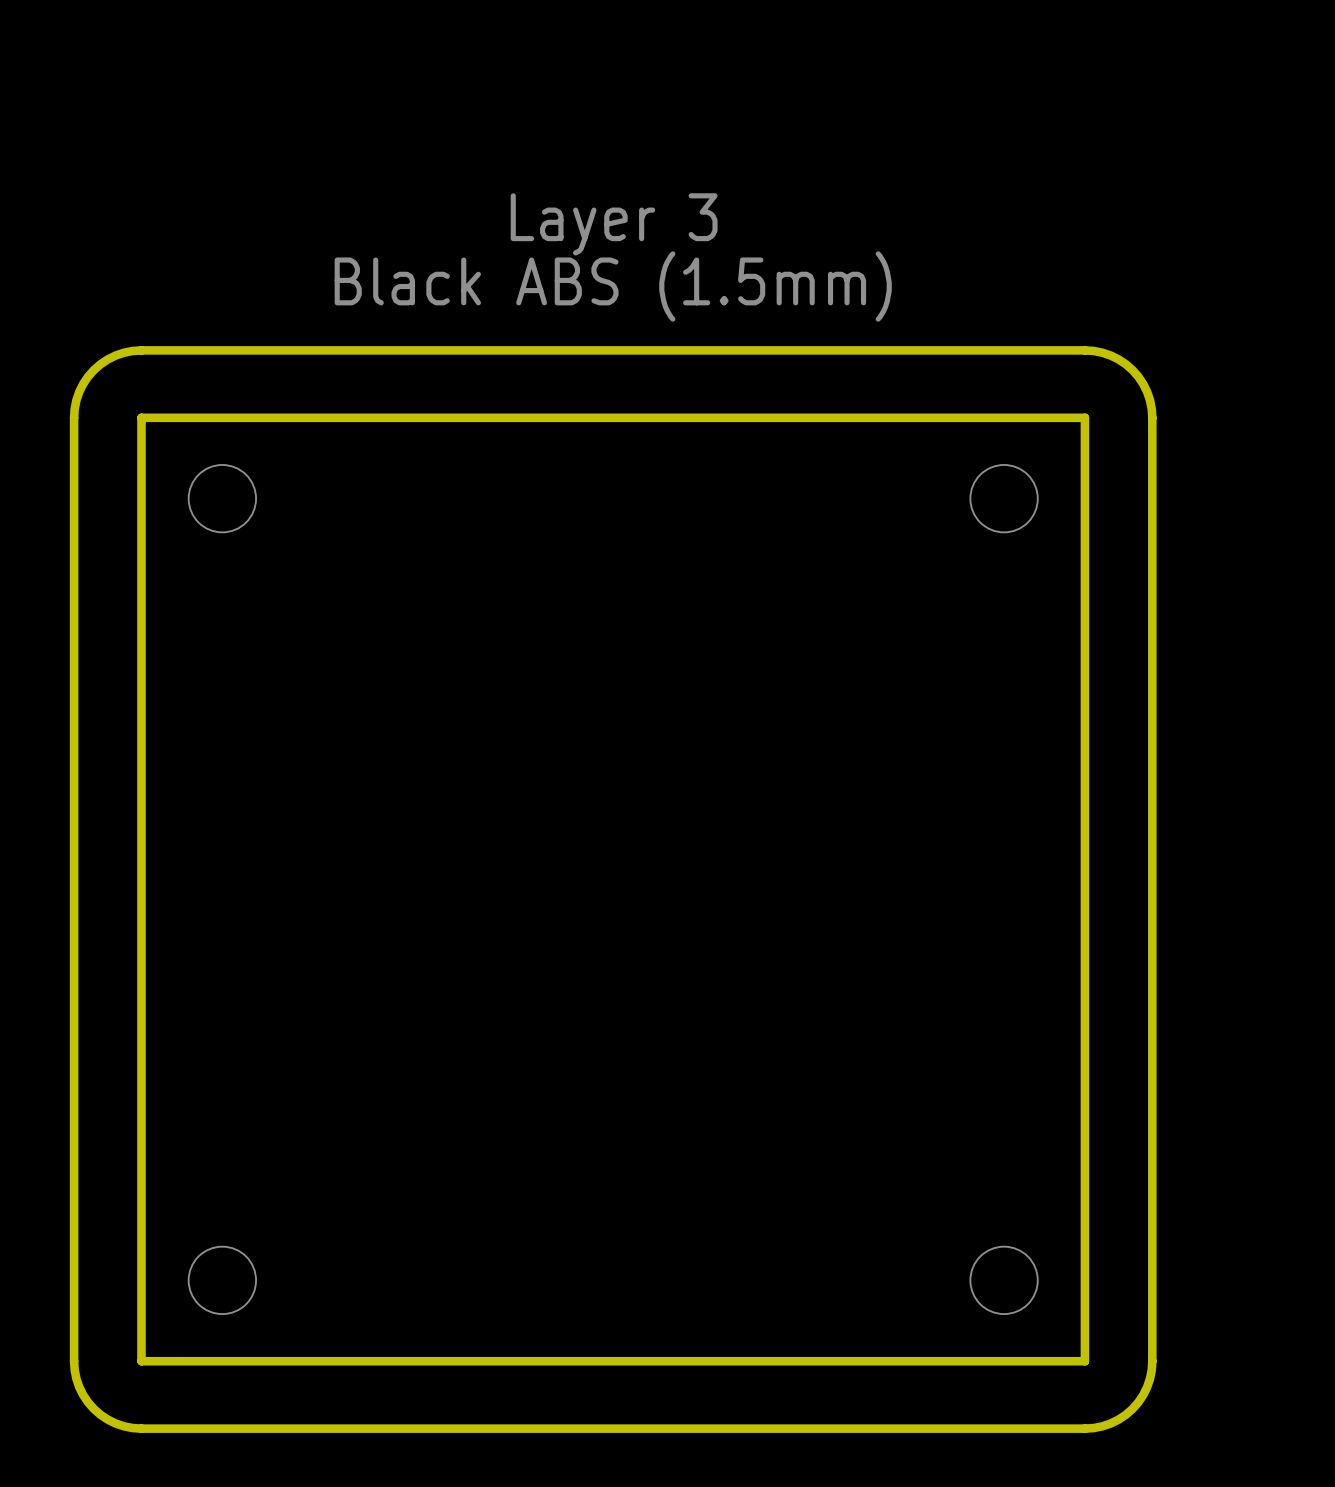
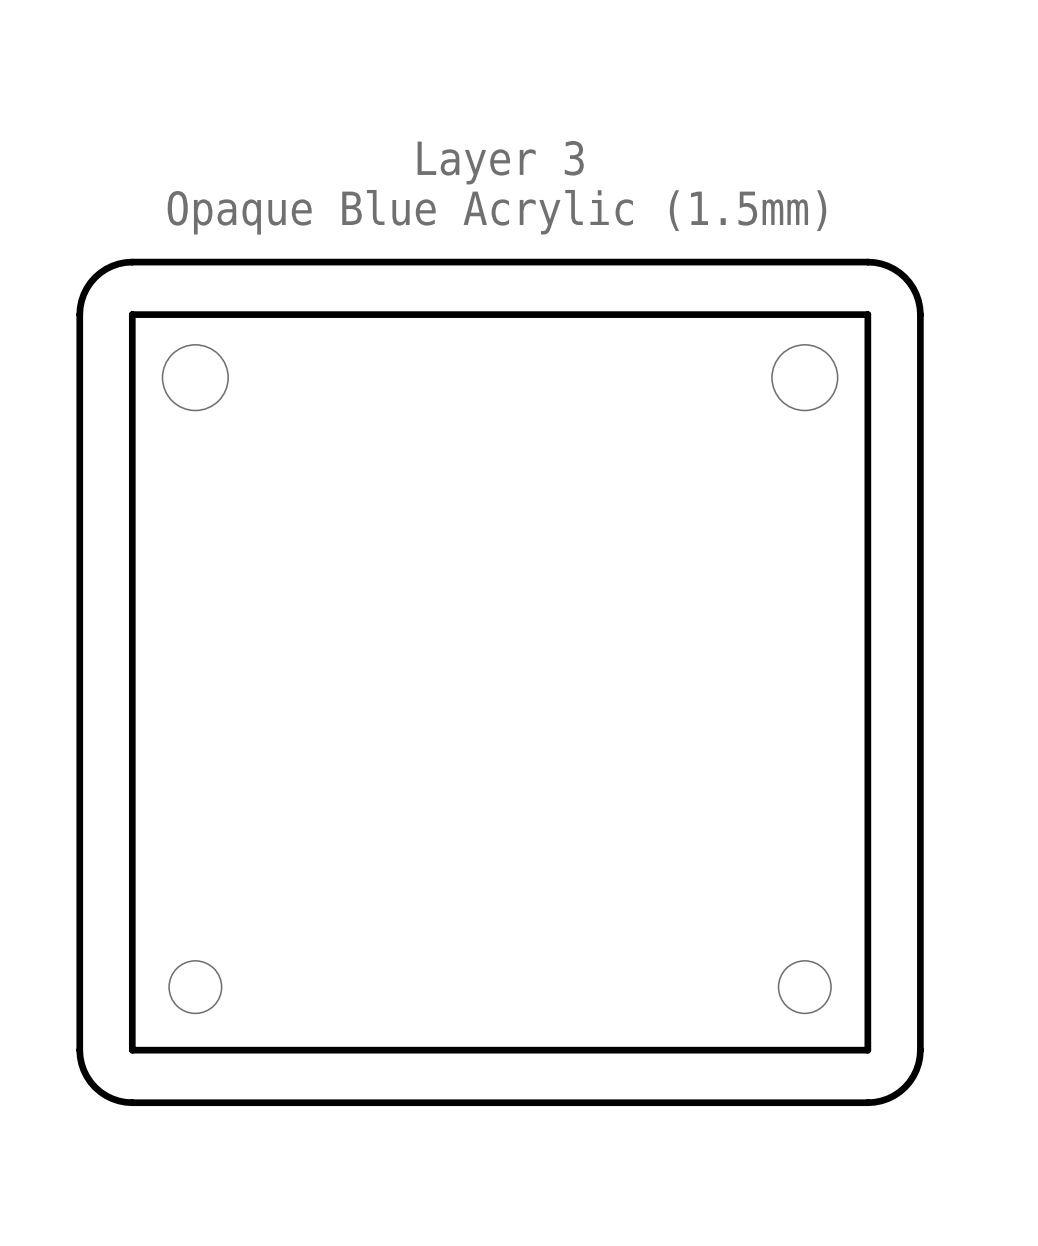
text: Black ABS (1.5mm) (613, 286) -> Opaque Blue Acrylic (1.5mm) (496, 212)
drawing shape: [187, 464, 257, 534] -> [161, 344, 229, 412]
drawing shape: [969, 464, 1039, 534] -> [771, 344, 839, 412]

